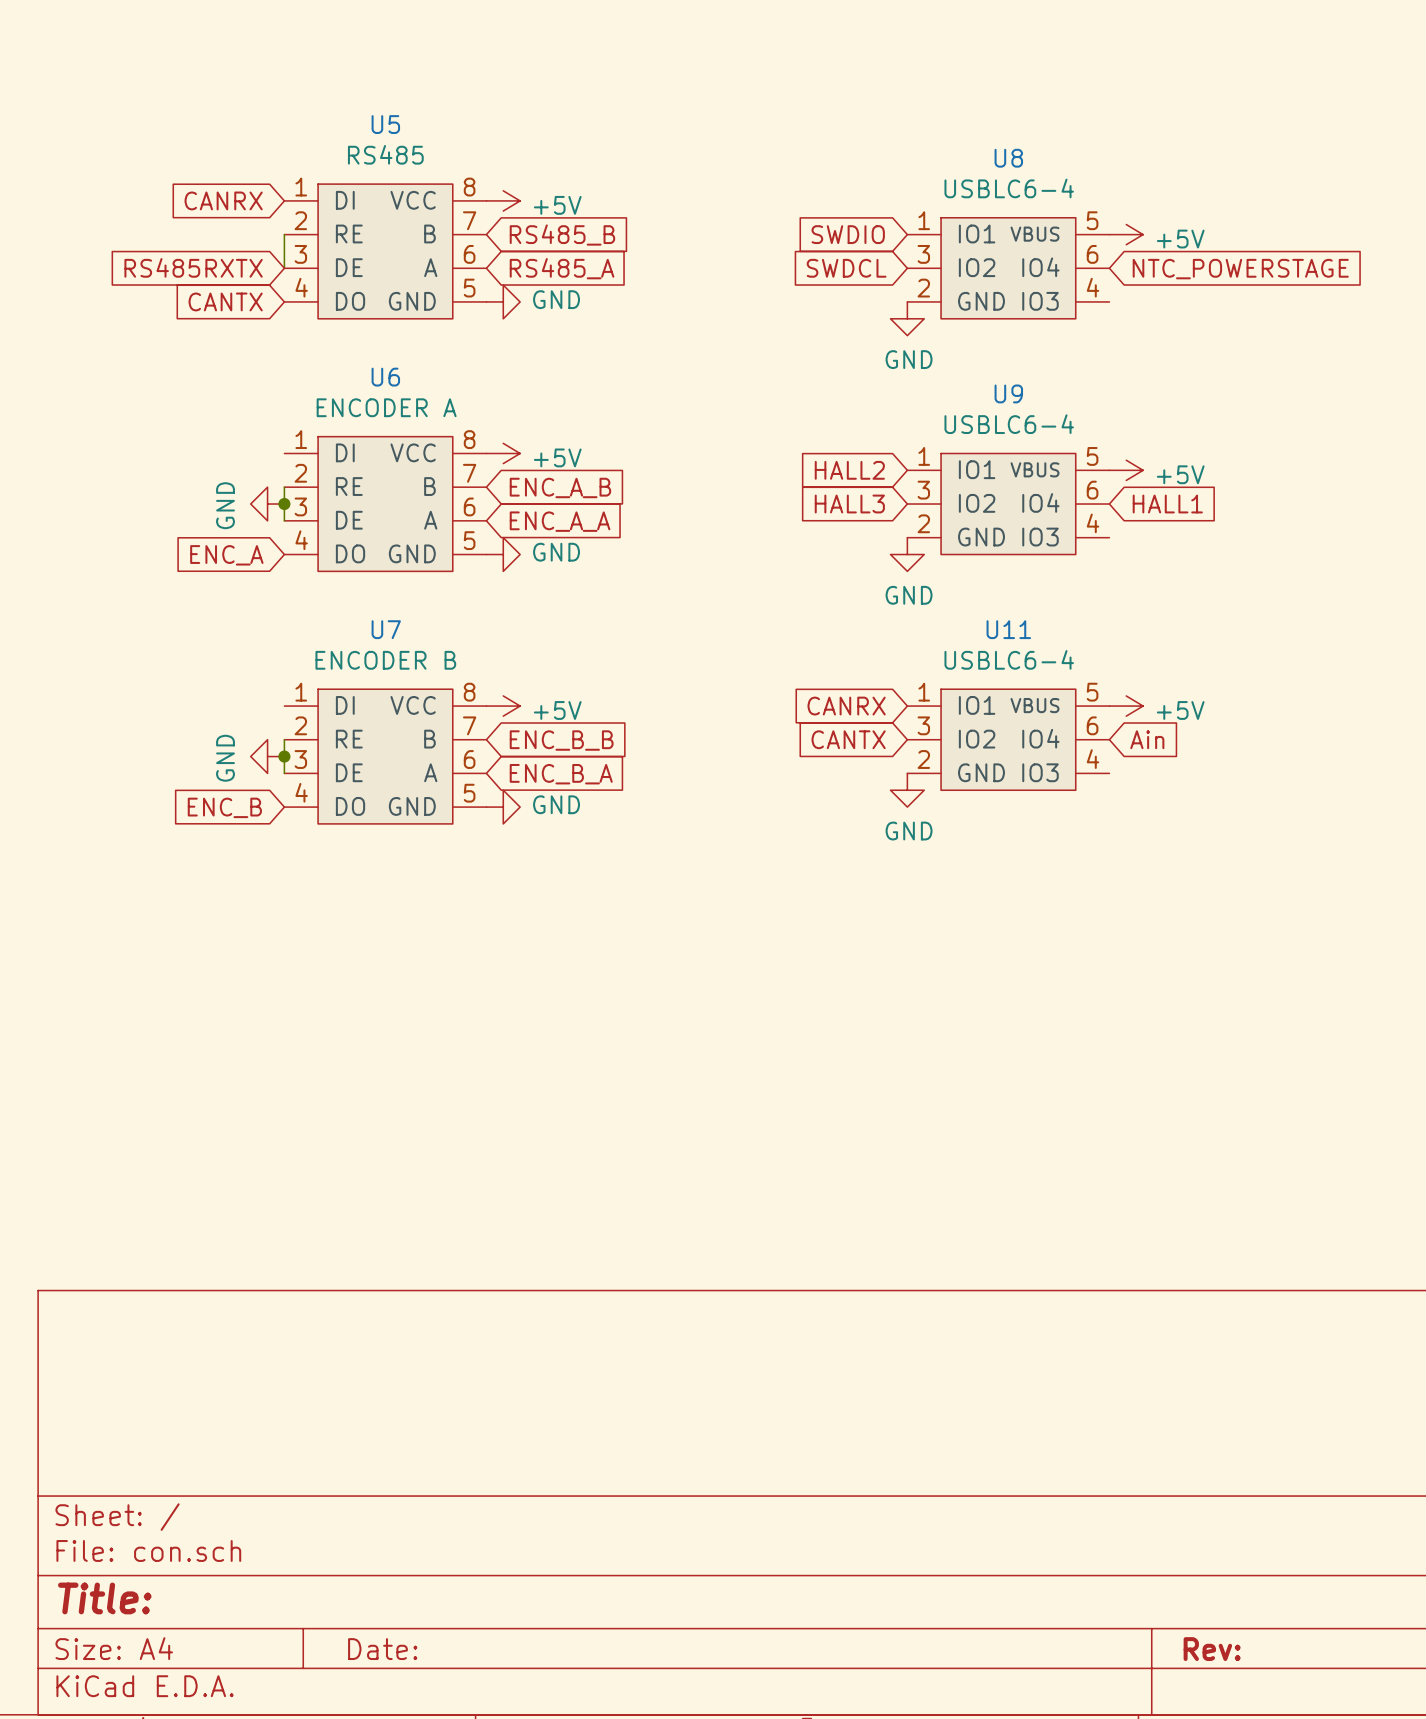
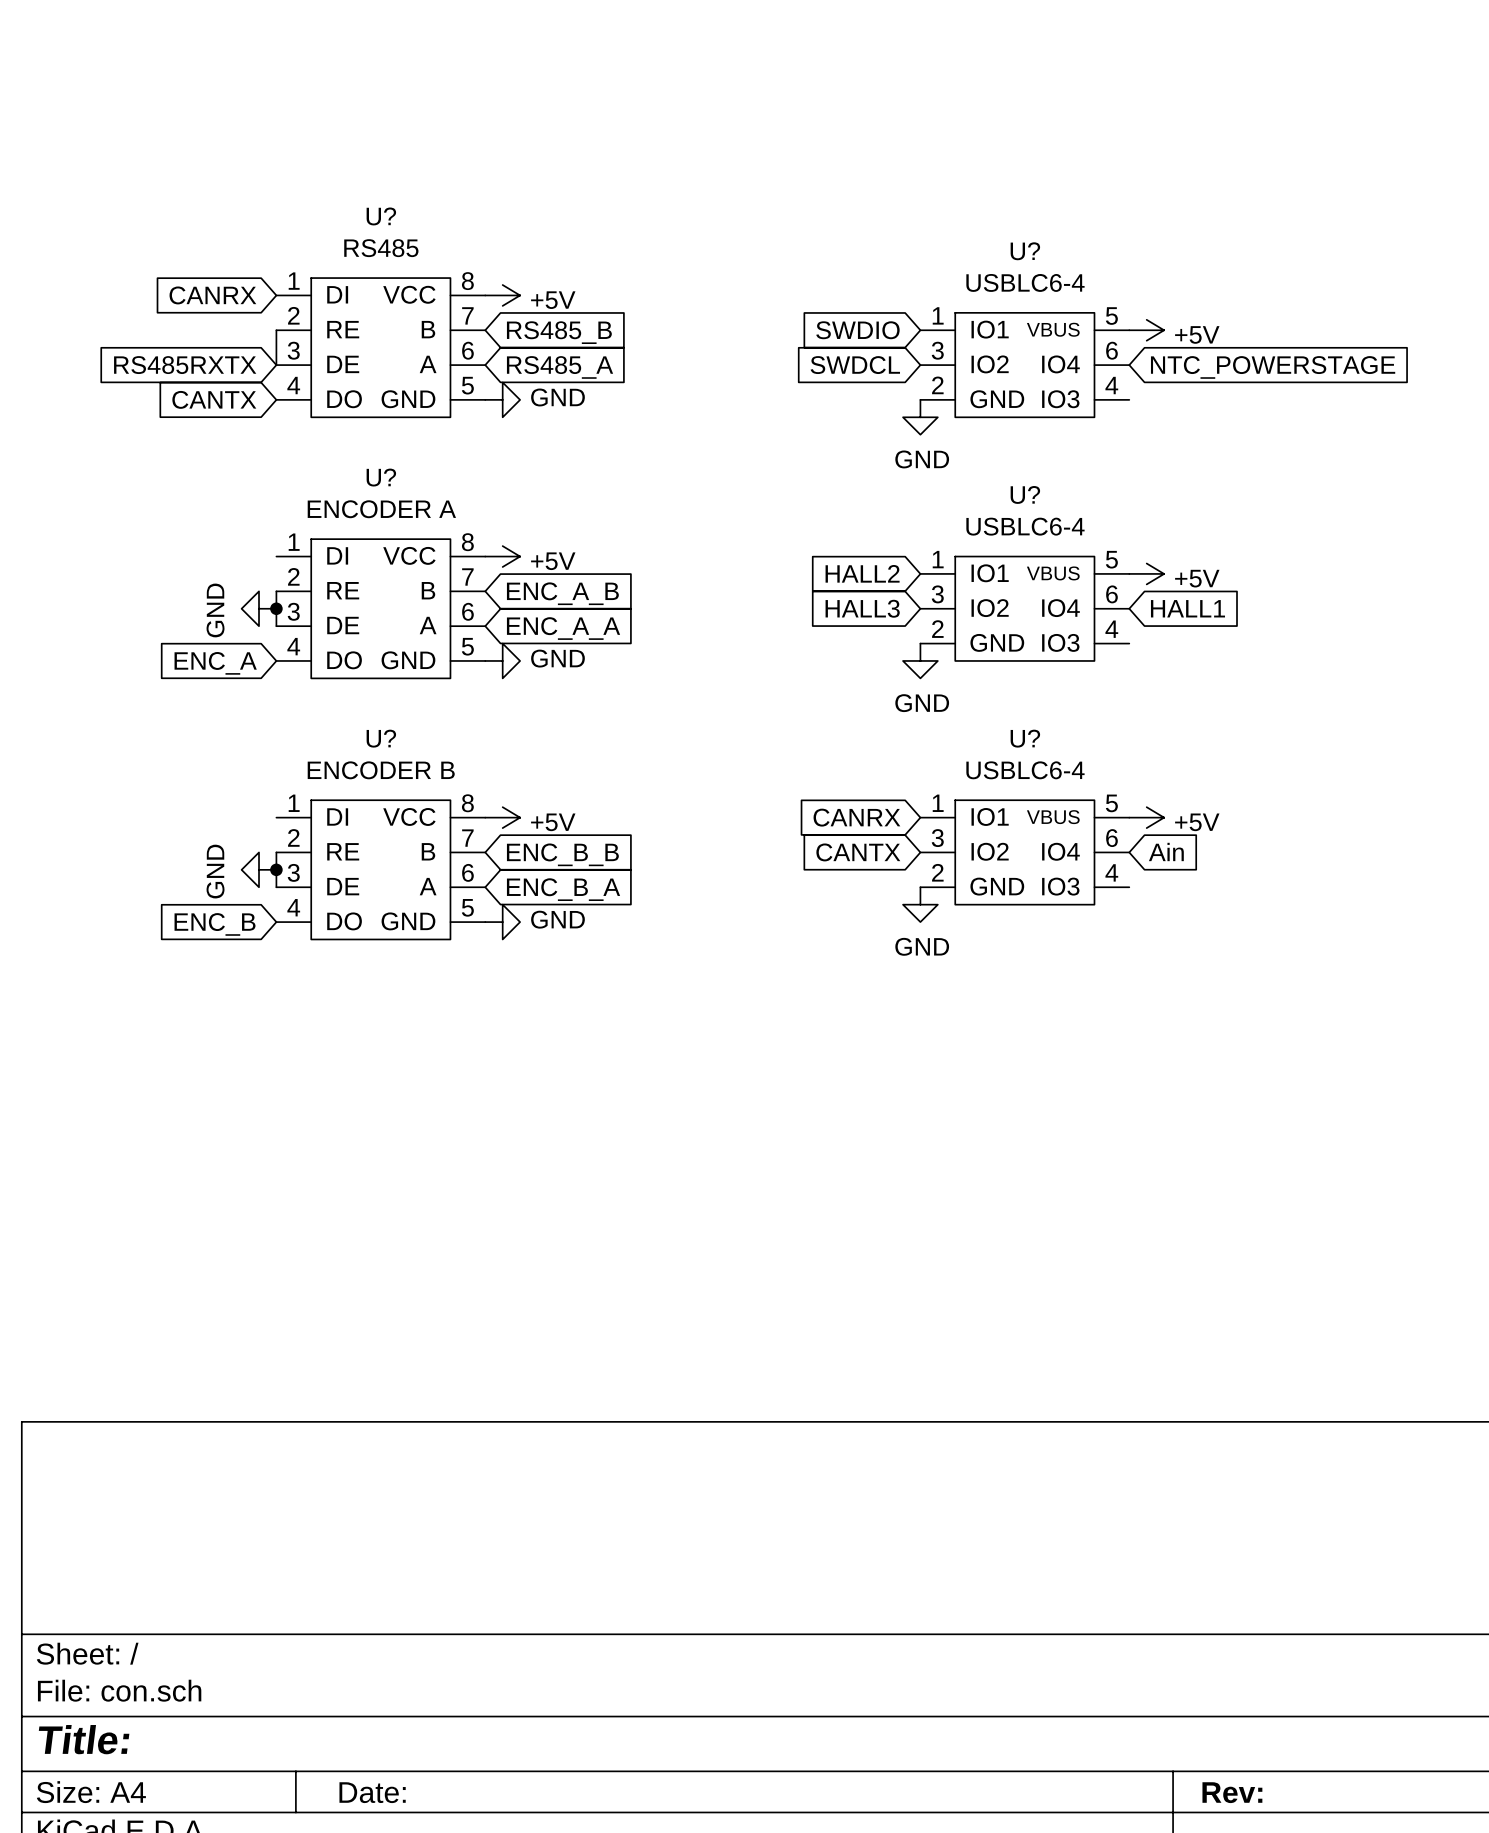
U5 name: U5 (385, 124) -> U? (381, 216)
U8 name: U8 (1008, 158) -> U? (1025, 251)
U6 name: U6 (385, 377) -> U? (381, 477)
U9 name: U9 (1008, 393) -> U? (1025, 494)
U7 name: U7 (386, 629) -> U? (381, 738)
U11 name: U11 (1008, 629) -> U? (1025, 738)

